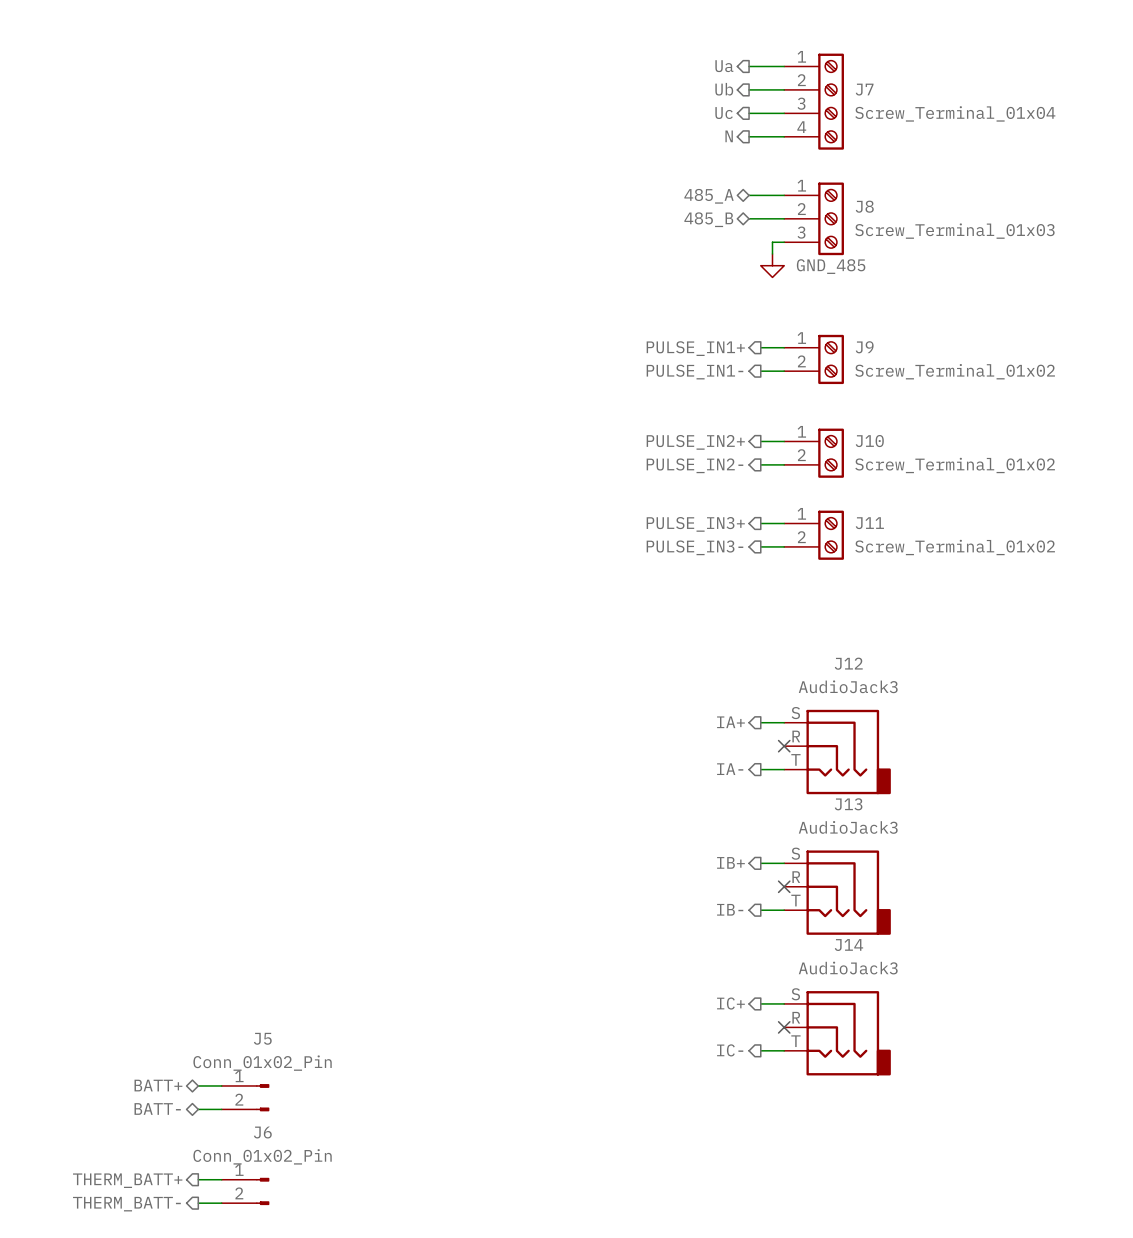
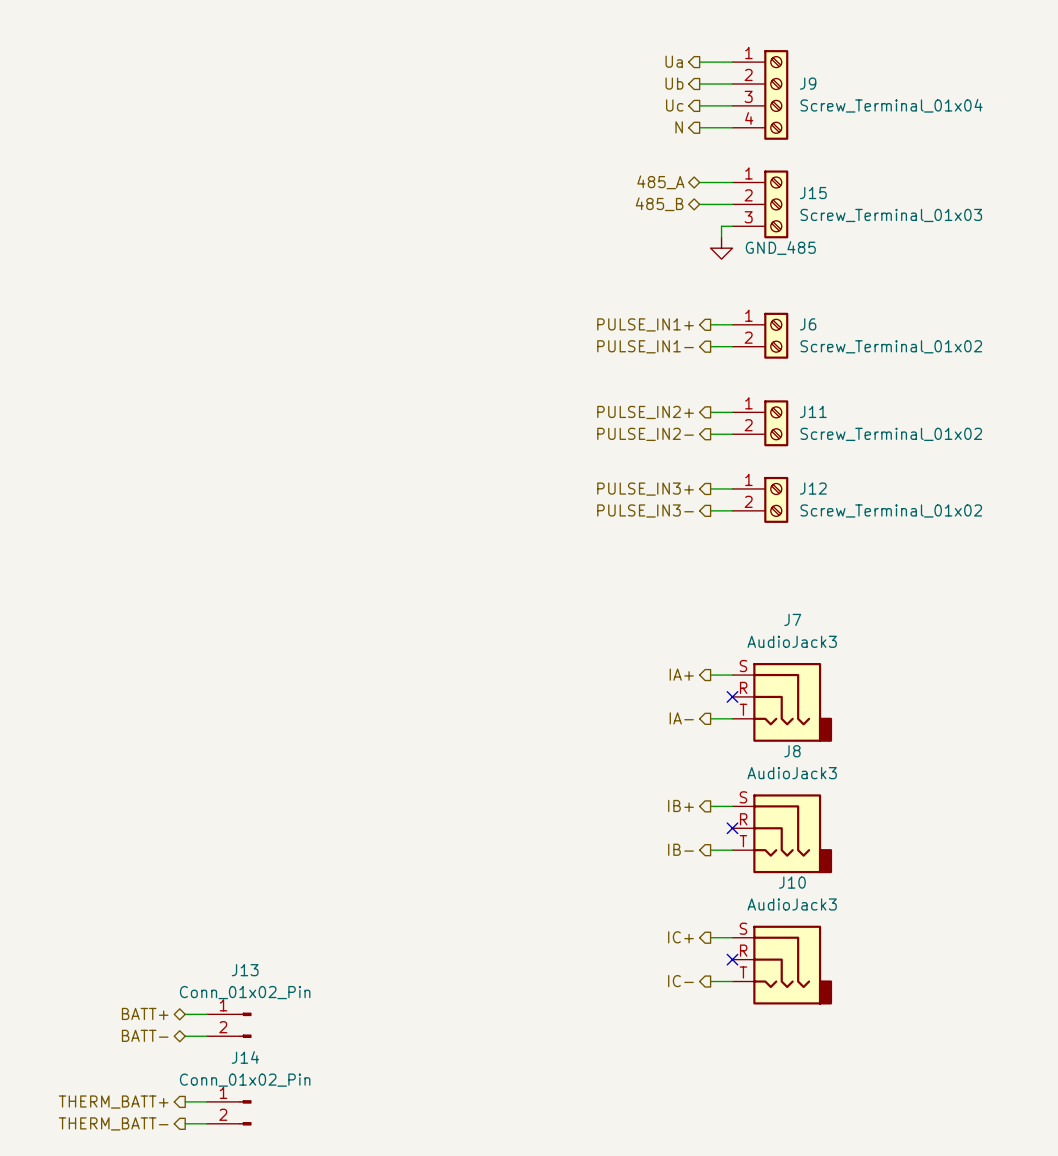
J7 name: J7 (864, 89) -> J9 (808, 83)
J8 name: J8 (864, 206) -> J15 (813, 193)
J9 name: J9 (864, 347) -> J6 (808, 324)
J10 name: J10 (869, 441) -> J11 (813, 411)
J11 name: J11 (869, 523) -> J12 (813, 488)
J12 name: J12 (848, 663) -> J7 (792, 619)
J13 name: J13 (848, 804) -> J8 (792, 751)
J14 name: J14 (848, 945) -> J10 (792, 882)
J5 name: J5 (262, 1038) -> J13 (245, 970)
J6 name: J6 (262, 1132) -> J14 (245, 1057)

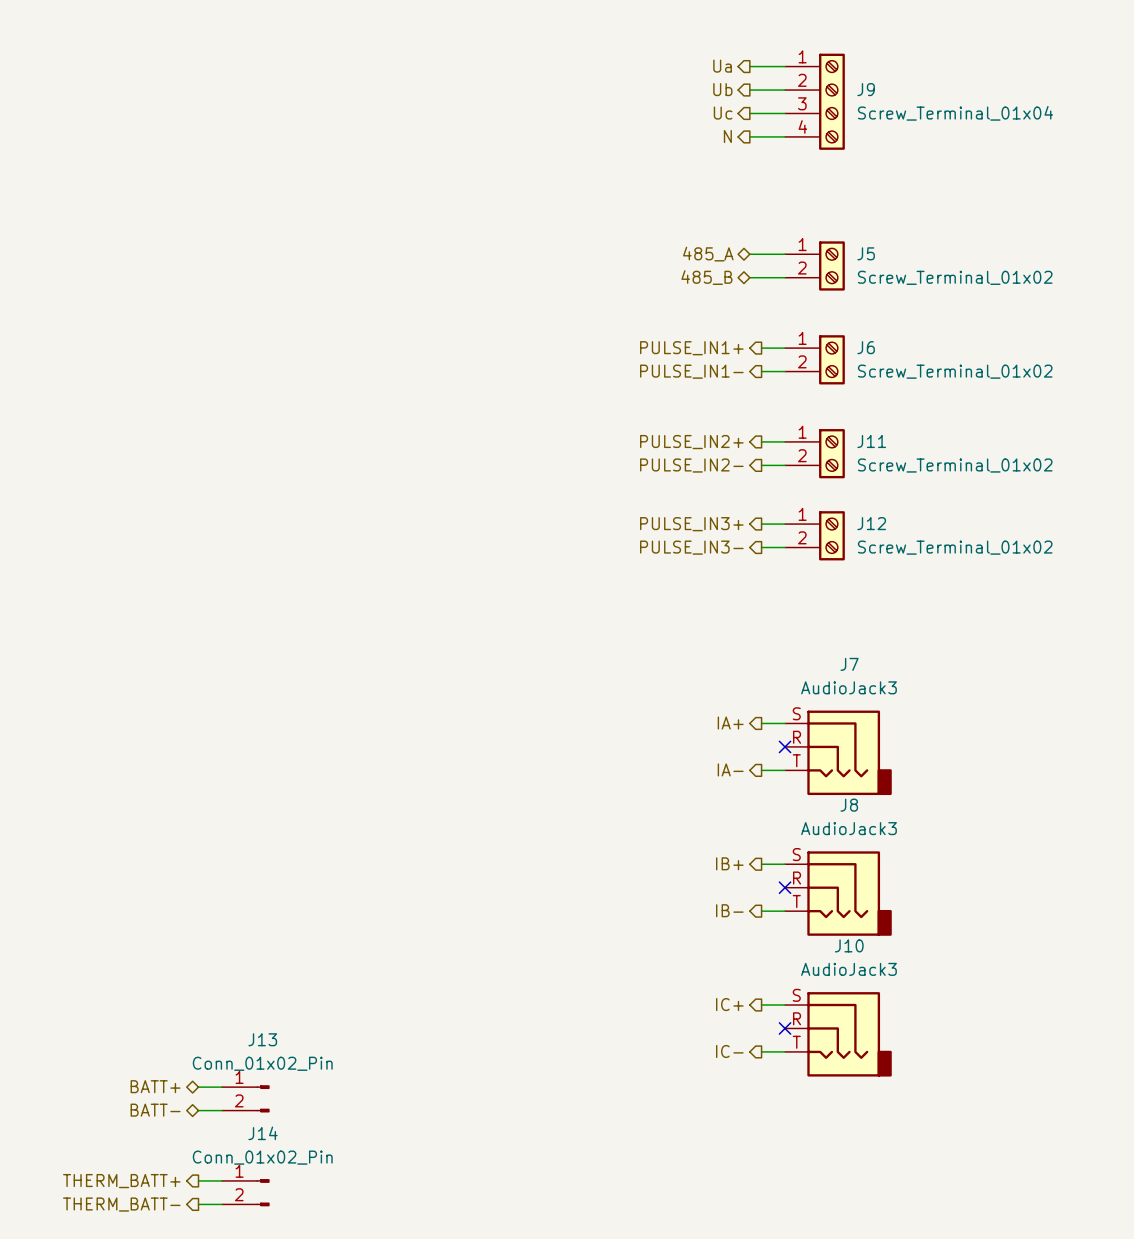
hierarchical label position: 485_A (660, 182) -> 485_A (708, 254)
wire: (699, 182) (732, 182) -> (749, 277) (785, 277)
hierarchical label position: 485_B (659, 204) -> 485_B (706, 277)
wire: (699, 204) (732, 204) -> (749, 254) (785, 254)
J15: Screw_Terminal_01x03 (760, 204) -> none
wire: (732, 226) (721, 226) (721, 237) -> none
power symbol: GND_485 (721, 248) -> none
J5: none -> Screw_Terminal_01x02 (814, 265)

